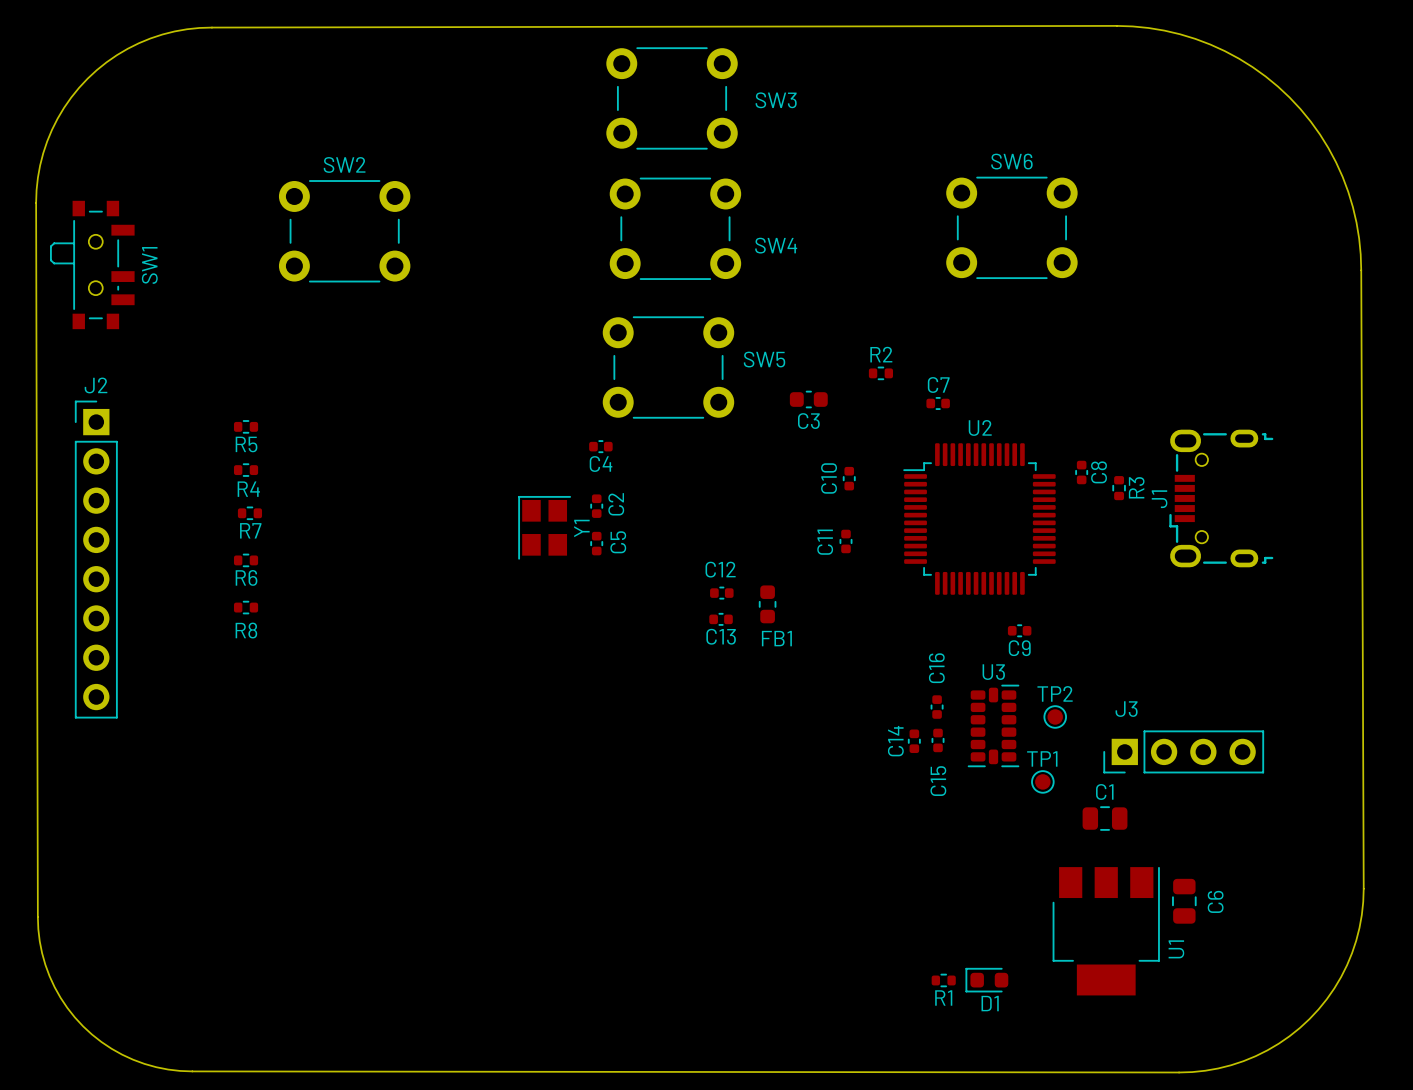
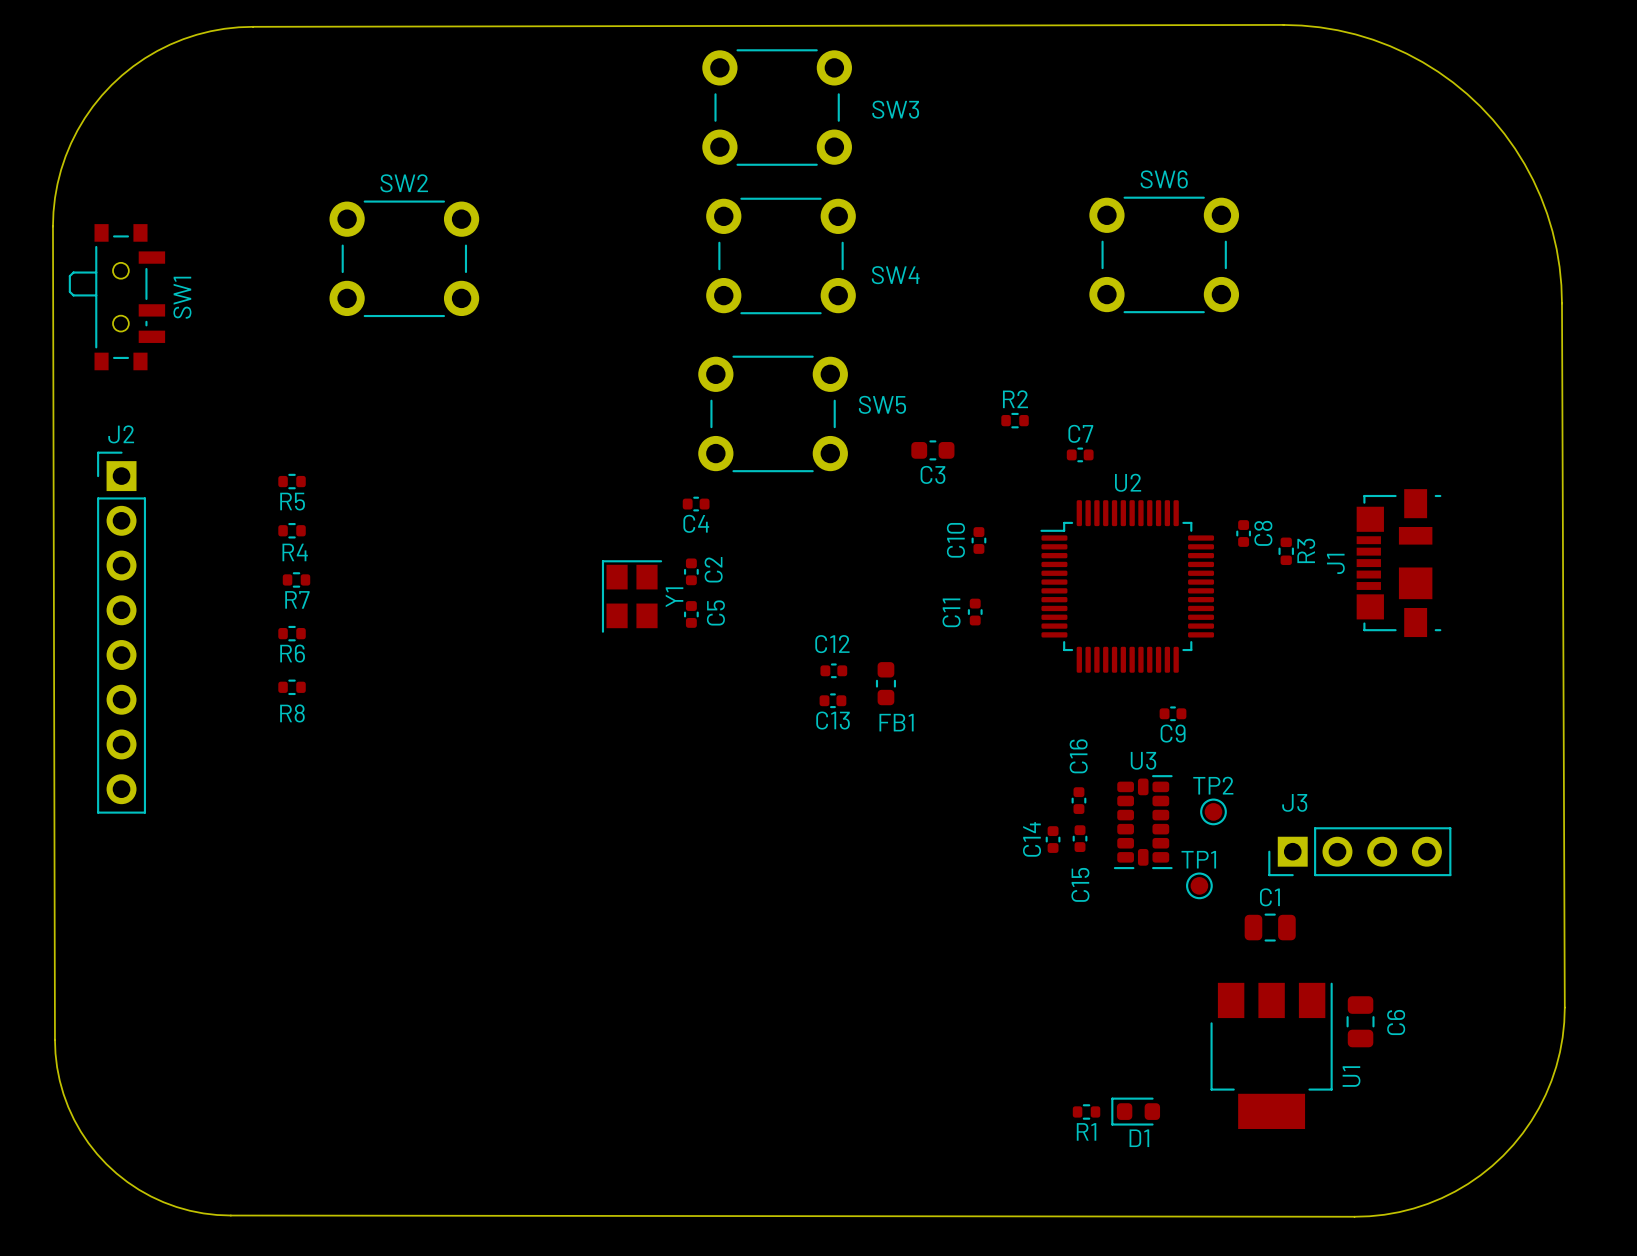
J1 footprint: [1169, 429, 1274, 568] -> [1356, 489, 1442, 638]

